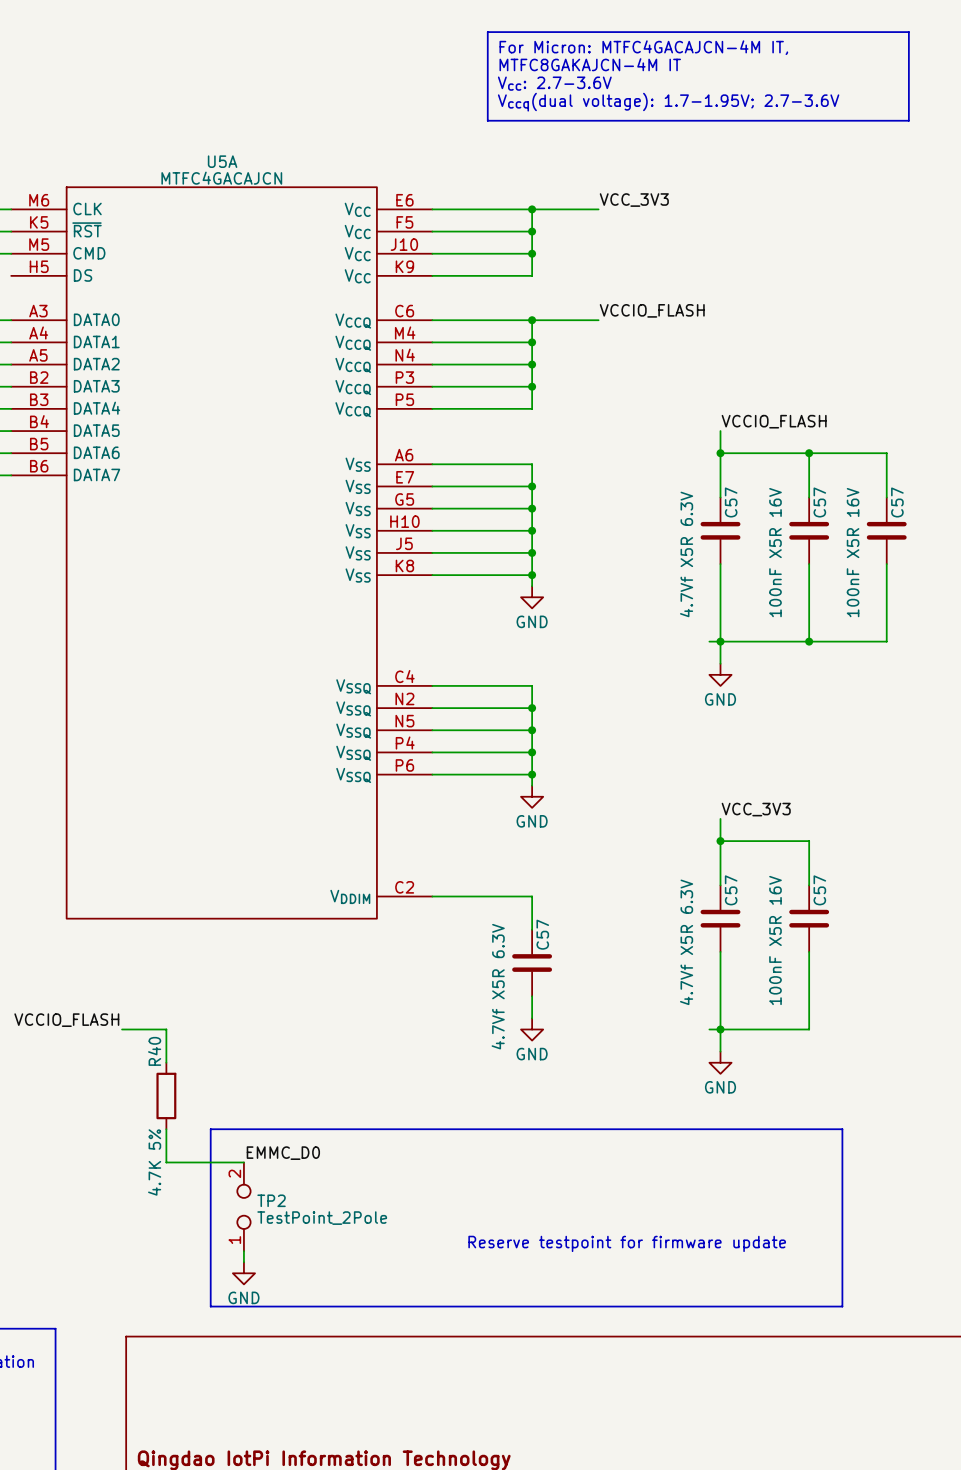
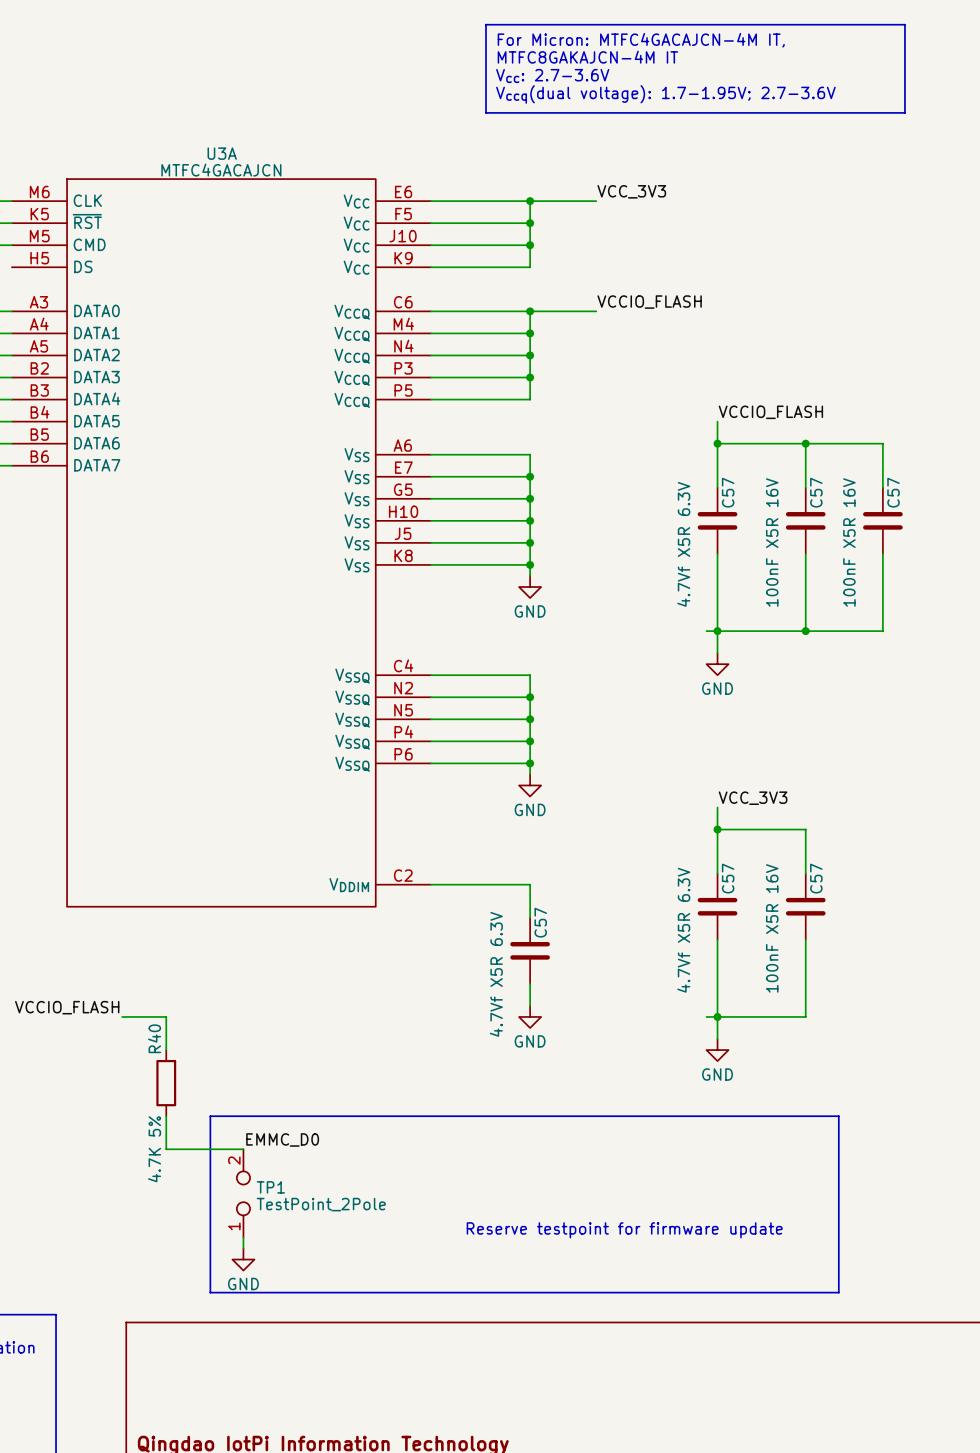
U5A name: U5A (222, 161) -> U3A (222, 153)
TP2 name: TP2 (271, 1200) -> TP1 (270, 1187)

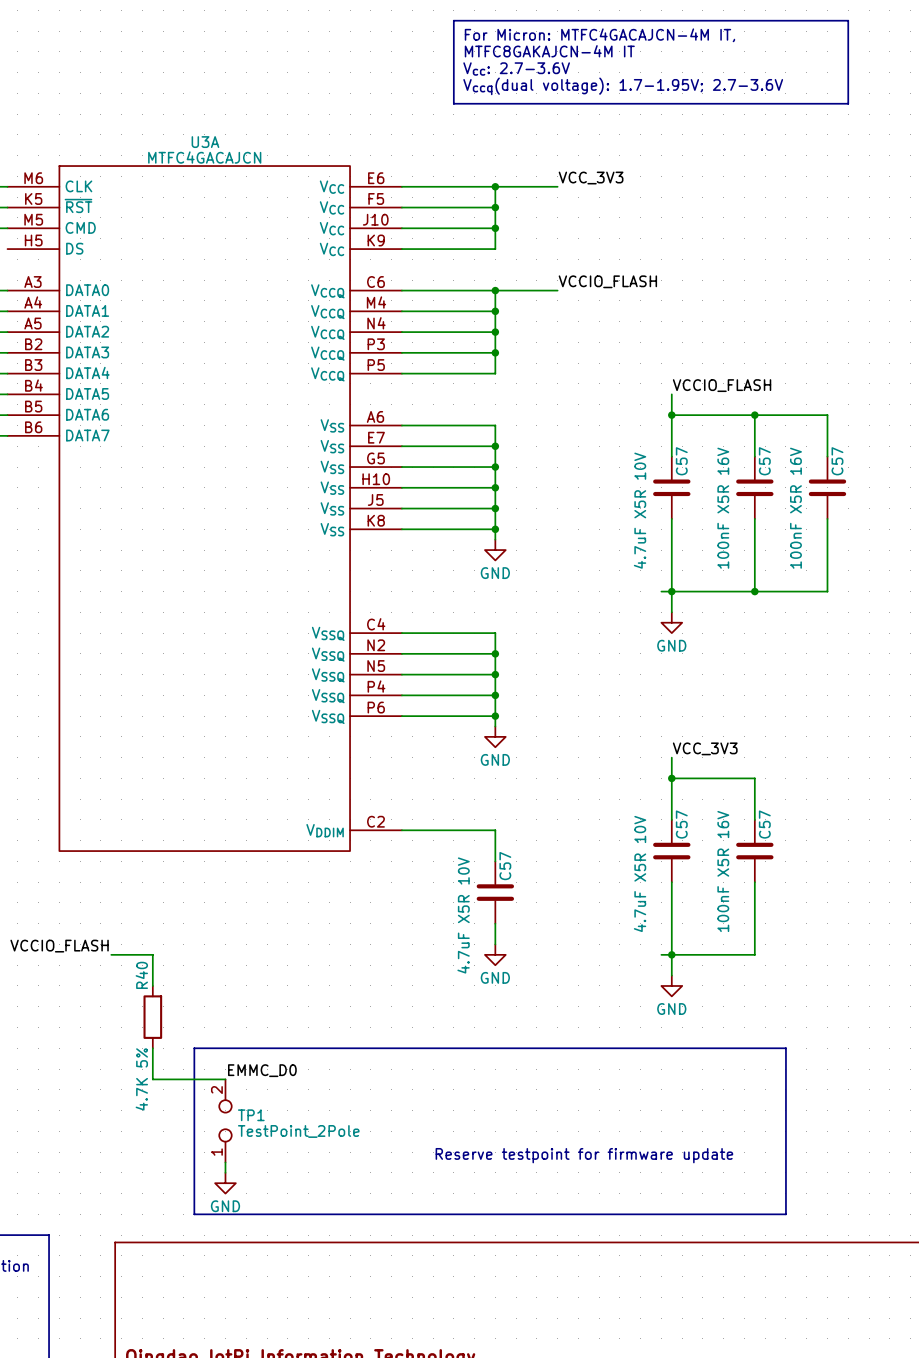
C57 value: 4.7Vf X5R 6.3V (683, 544) -> 4.7uF X5R 10V (640, 510)
C57 value: 4.7Vf X5R 6.3V (683, 930) -> 4.7uF X5R 10V (640, 873)
C57 value: 4.7Vf X5R 6.3V (496, 974) -> 4.7uF X5R 10V (463, 915)

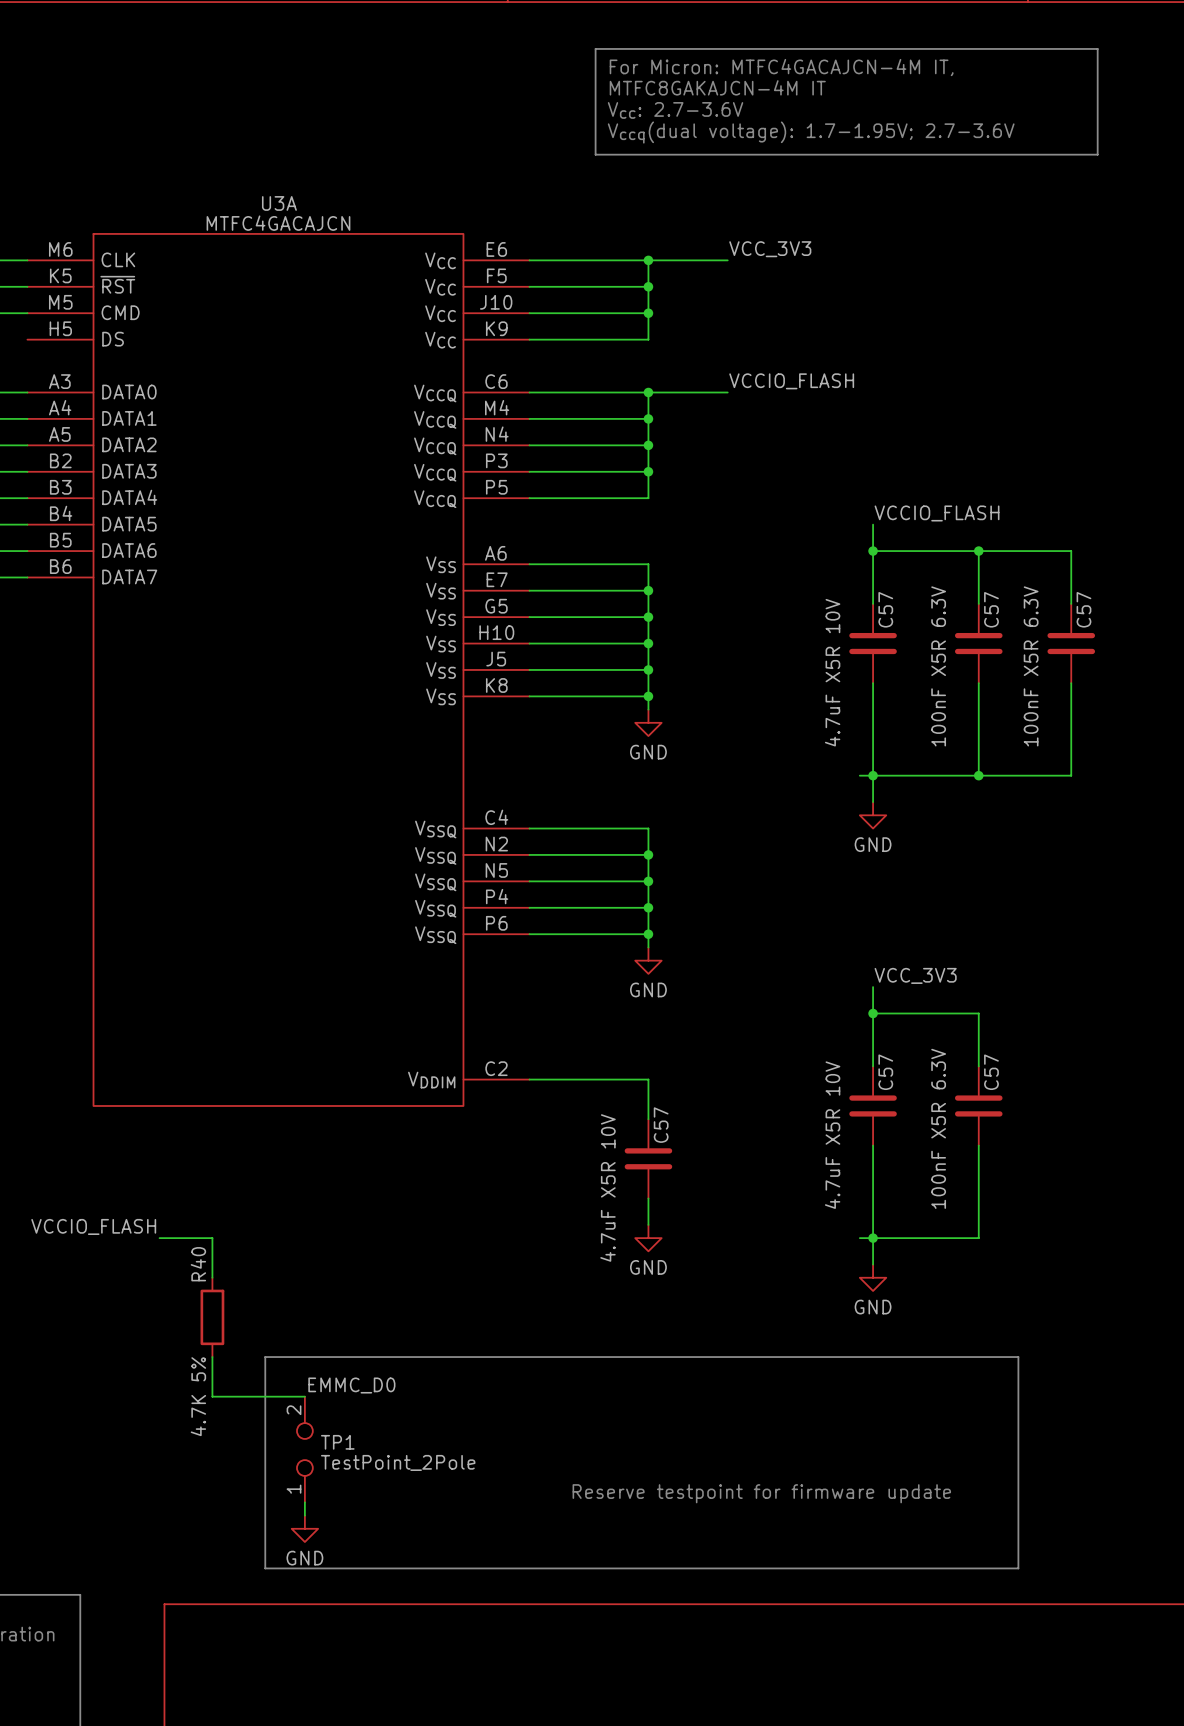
C57 value: 100nF X5R 16V (723, 508) -> 100nF X5R 6.3V (938, 666)
C57 value: 100nF X5R 16V (795, 508) -> 100nF X5R 6.3V (1031, 666)
C57 value: 100nF X5R 16V (723, 871) -> 100nF X5R 6.3V (938, 1128)

